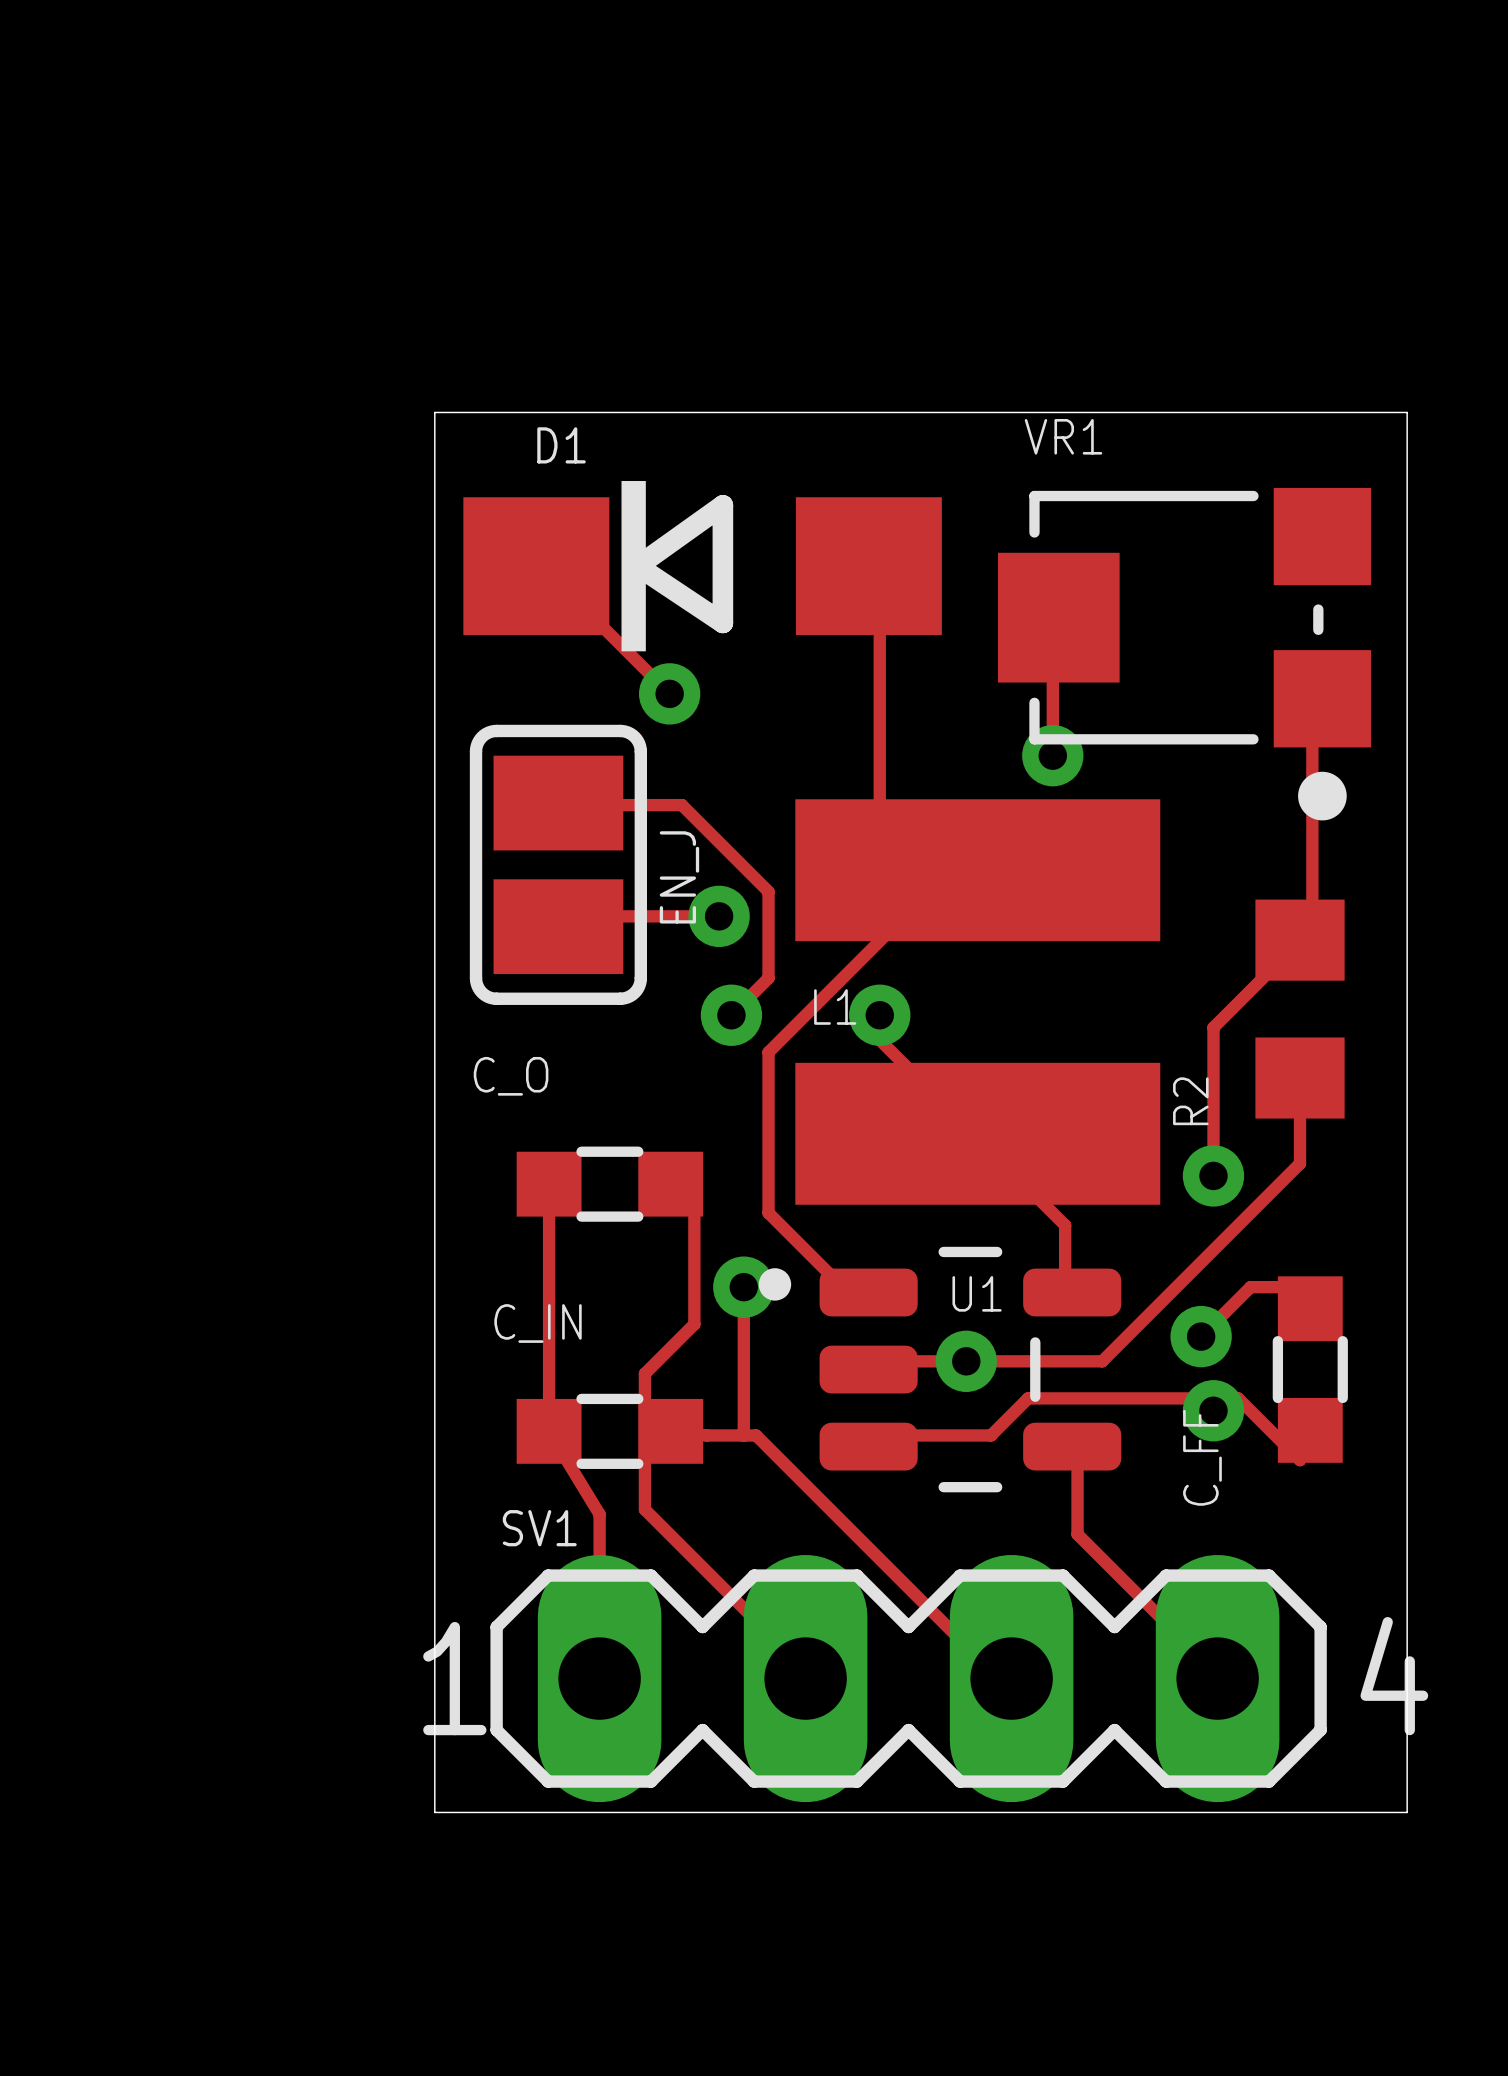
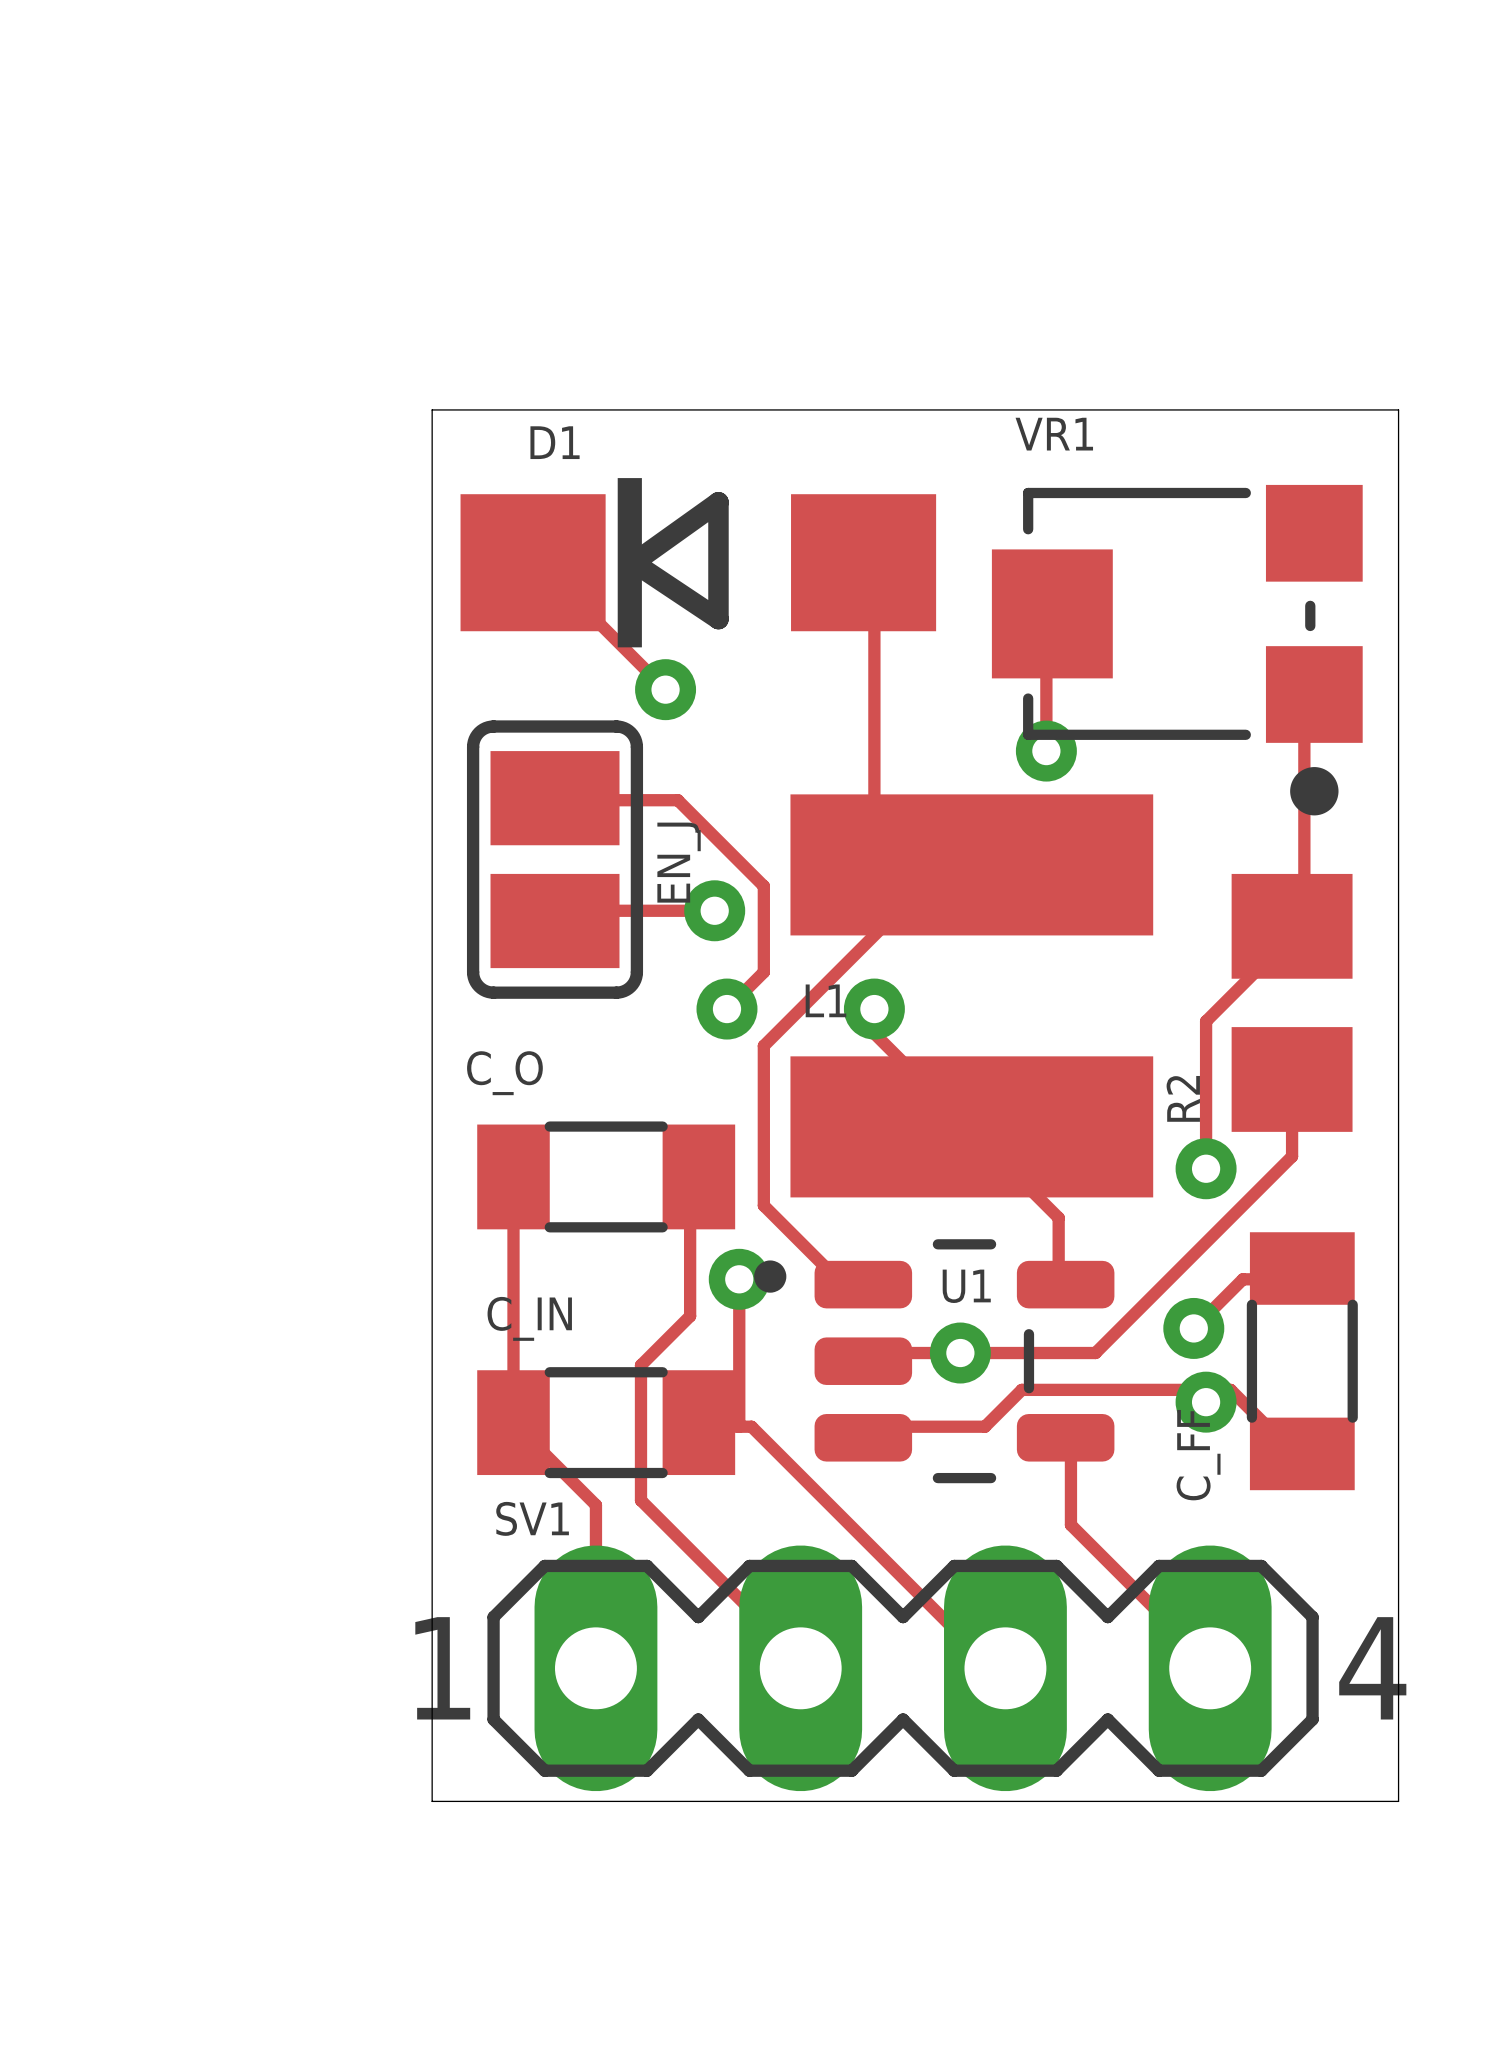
R2 footprint: [1255, 899, 1345, 1119] -> [1231, 873, 1353, 1132]
C_O footprint: [516, 1146, 704, 1222] -> [477, 1121, 736, 1233]
track: (549, 1184) (549, 1431) (599, 1514) -> (513, 1176) (513, 1422) (595, 1505)
C_FF footprint: [1272, 1276, 1348, 1463] -> [1246, 1232, 1358, 1491]
C_IN footprint: [516, 1393, 704, 1469] -> [477, 1367, 736, 1479]

